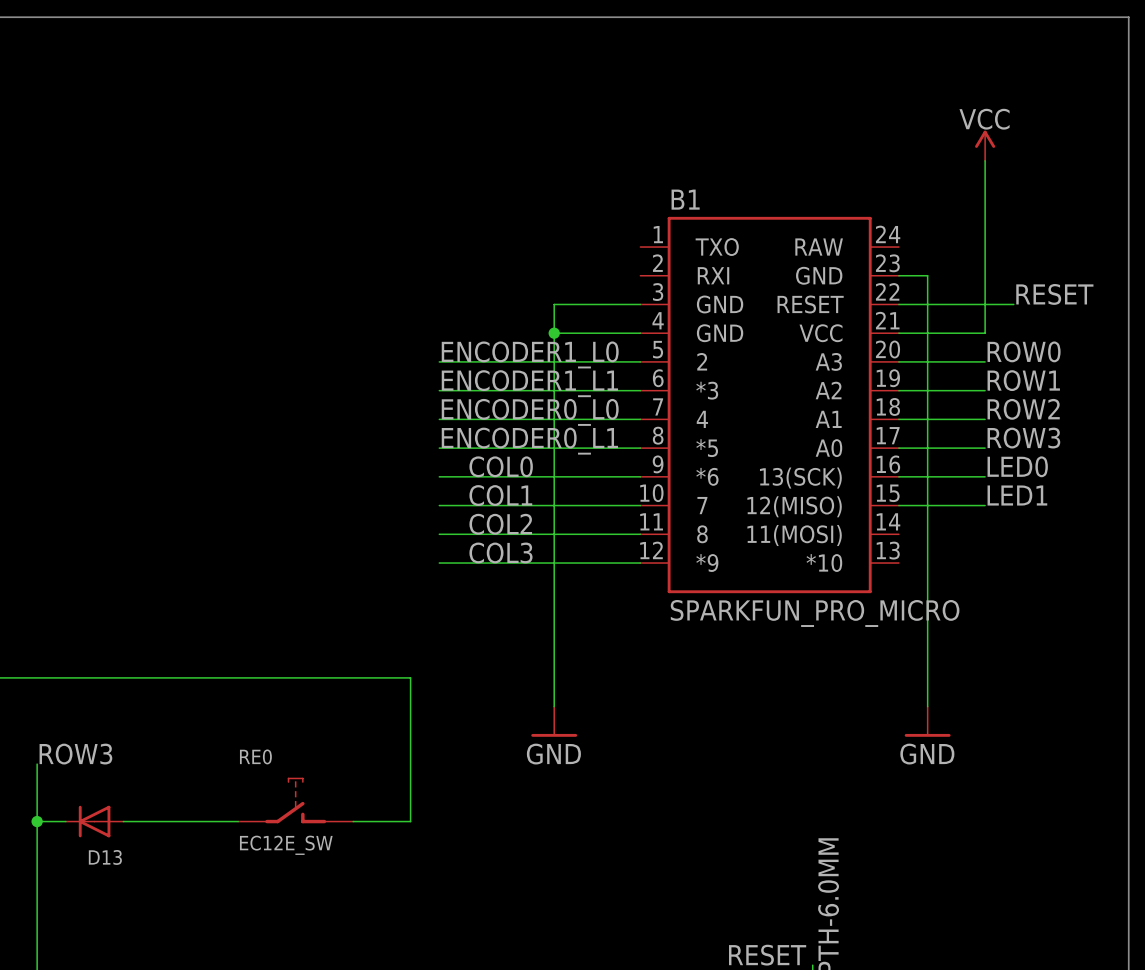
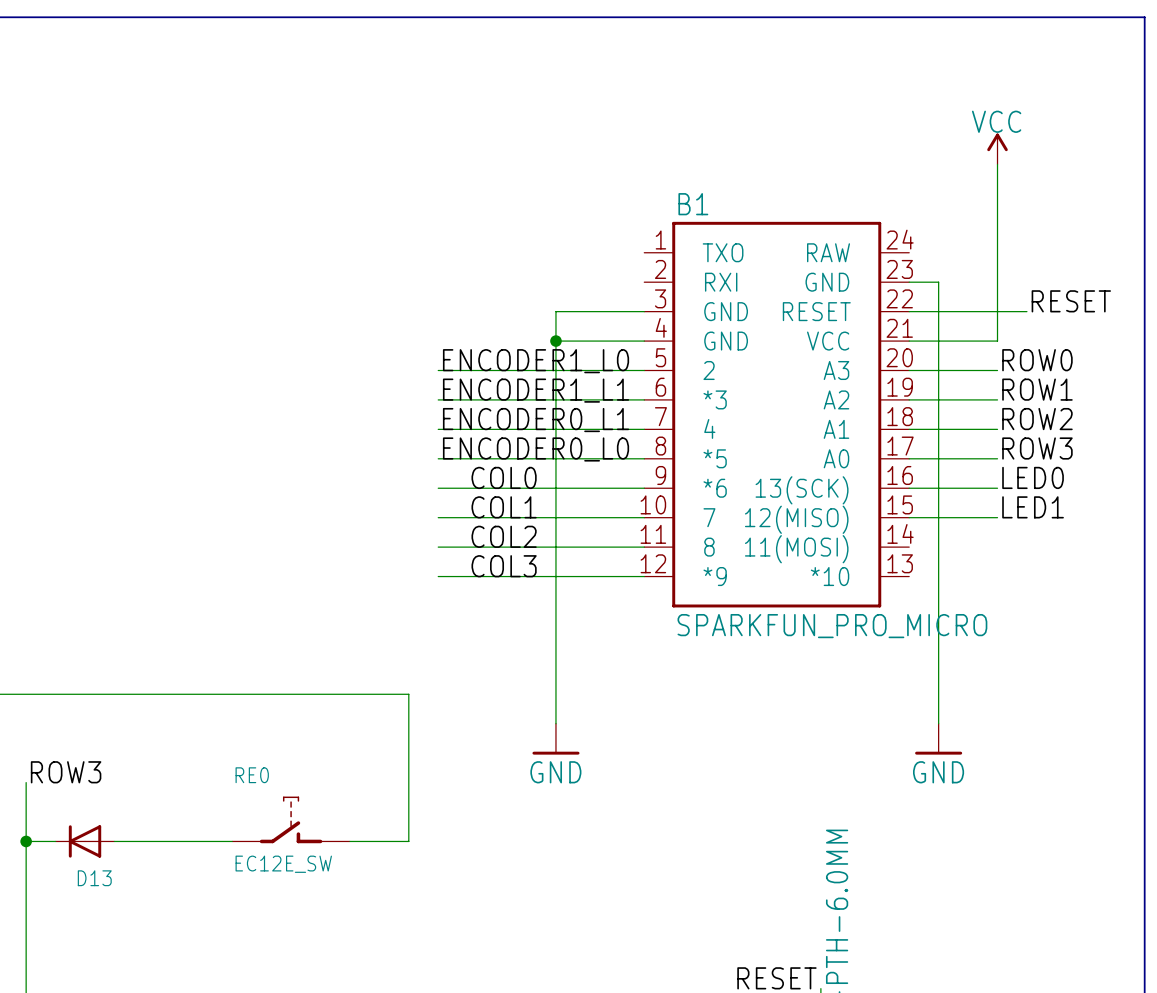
label: ENCODER0_L0 (530, 412) -> ENCODER0_L1 (536, 420)
label: ENCODER0_L1 (529, 441) -> ENCODER0_L0 (536, 449)

